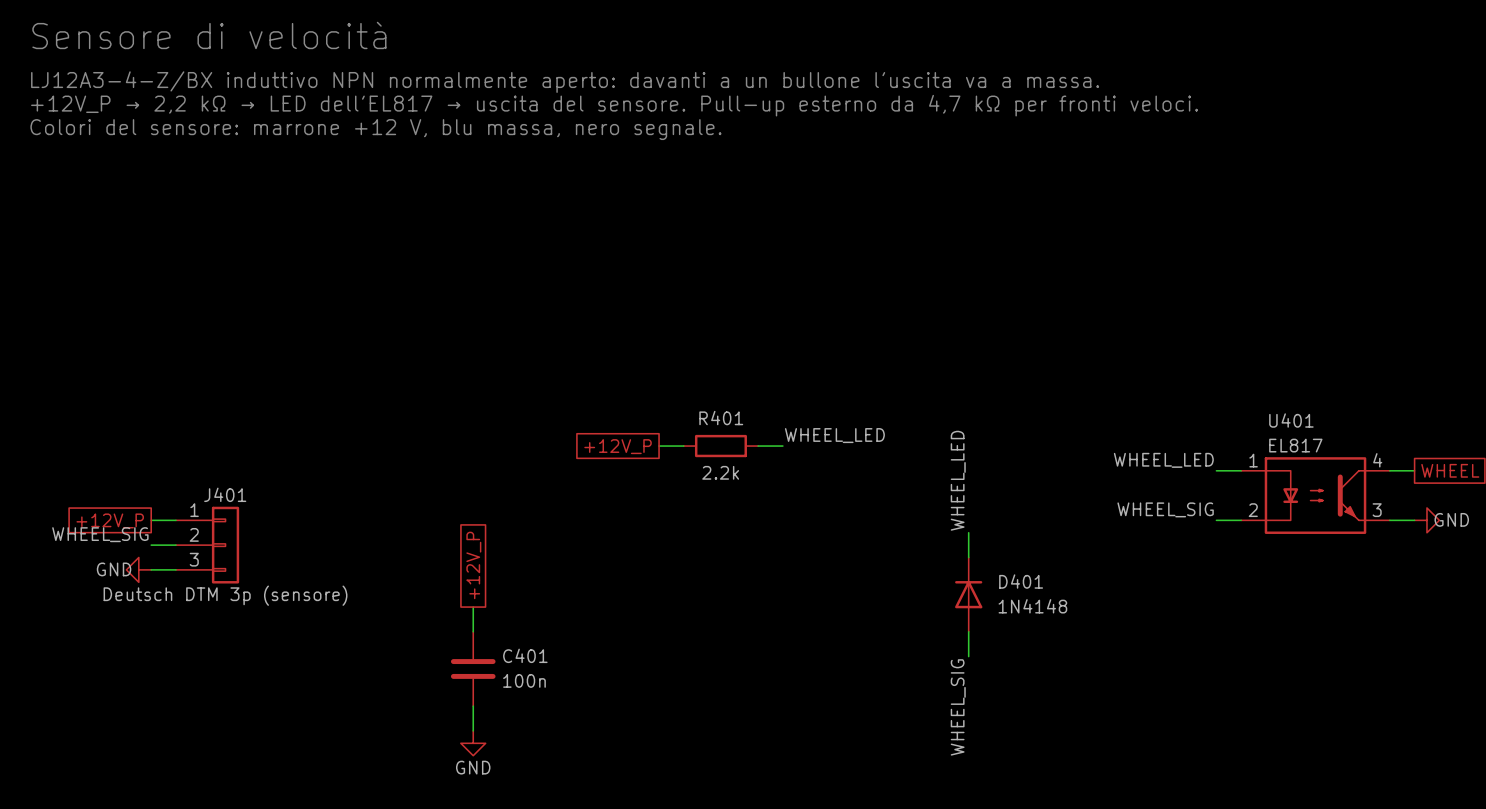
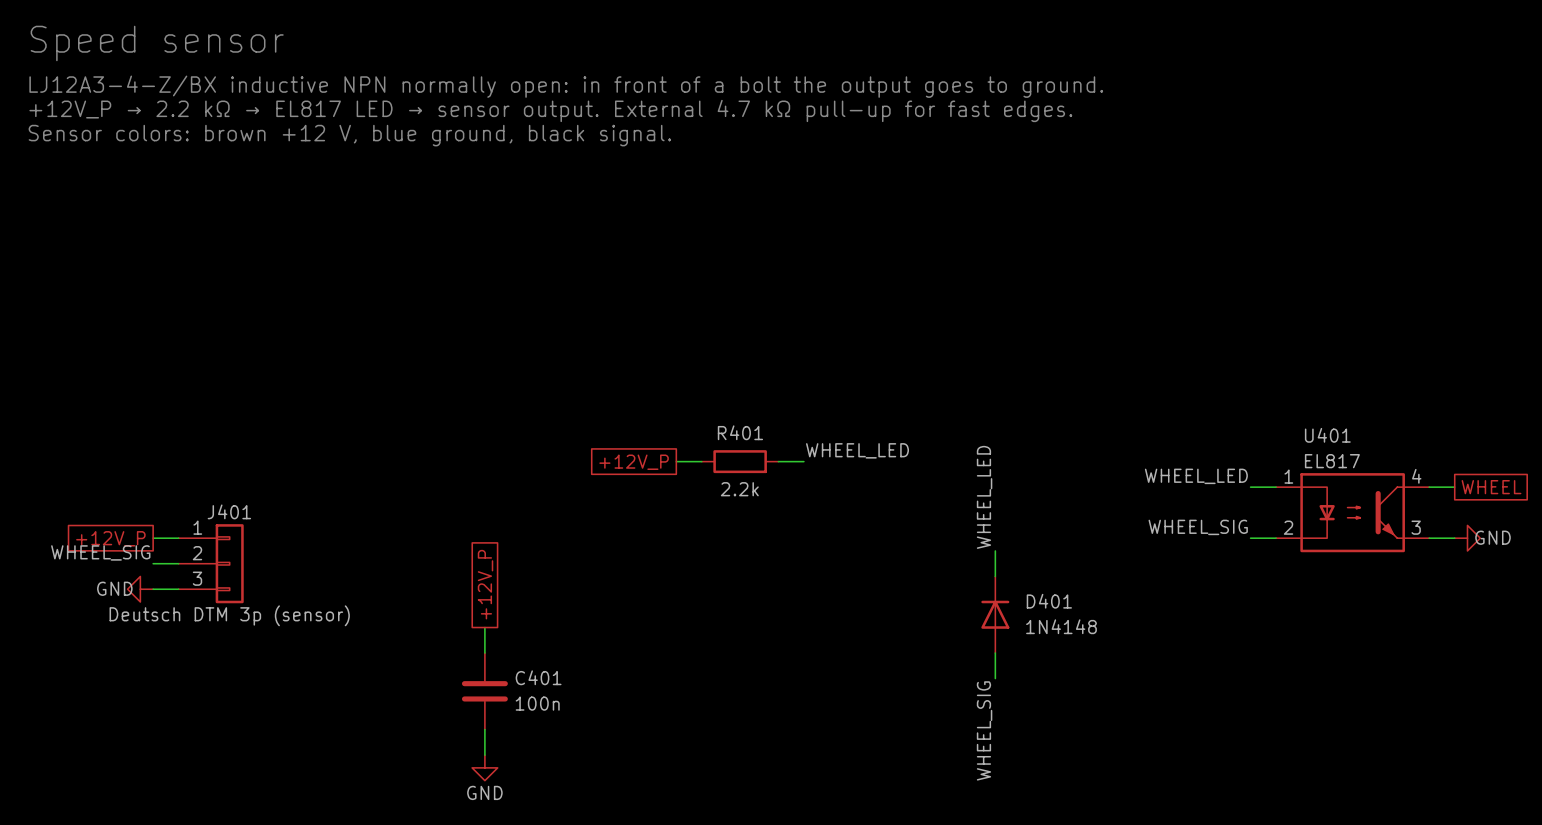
text: Sensore di velocità (209, 35) -> Speed sensor (157, 43)
text: LJ12A3-4-Z/BX induttivo NPN normalmente aperto: davanti a un bullone l'uscita va a massa. (565, 82) -> LJ12A3-4-Z/BX inductive NPN normally open: in front of a bolt the output goes to ground. (566, 86)
text: +12V_P → 2,2 kΩ → LED dell'EL817 → uscita del sensore. Pull-up esterno da 4,7 kΩ per fronti veloci. (614, 105) -> +12V_P → 2.2 kΩ → EL817 LED → sensor output. External 4.7 kΩ pull-up for fast edges. (550, 110)
text: Colori del sensore: marrone +12 V, blu massa, nero segnale. (375, 129) -> Sensor colors: brown +12 V, blue ground, black signal. (349, 135)
J401 value: Deutsch DTM 3p (sensore) (225, 595) -> Deutsch DTM 3p (sensor) (229, 615)

